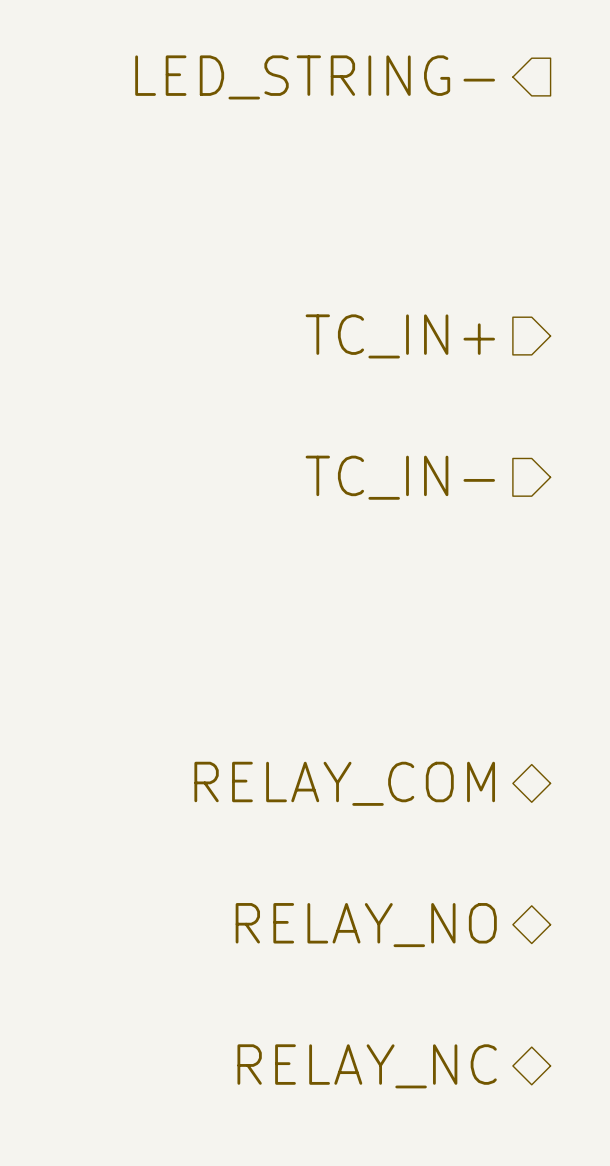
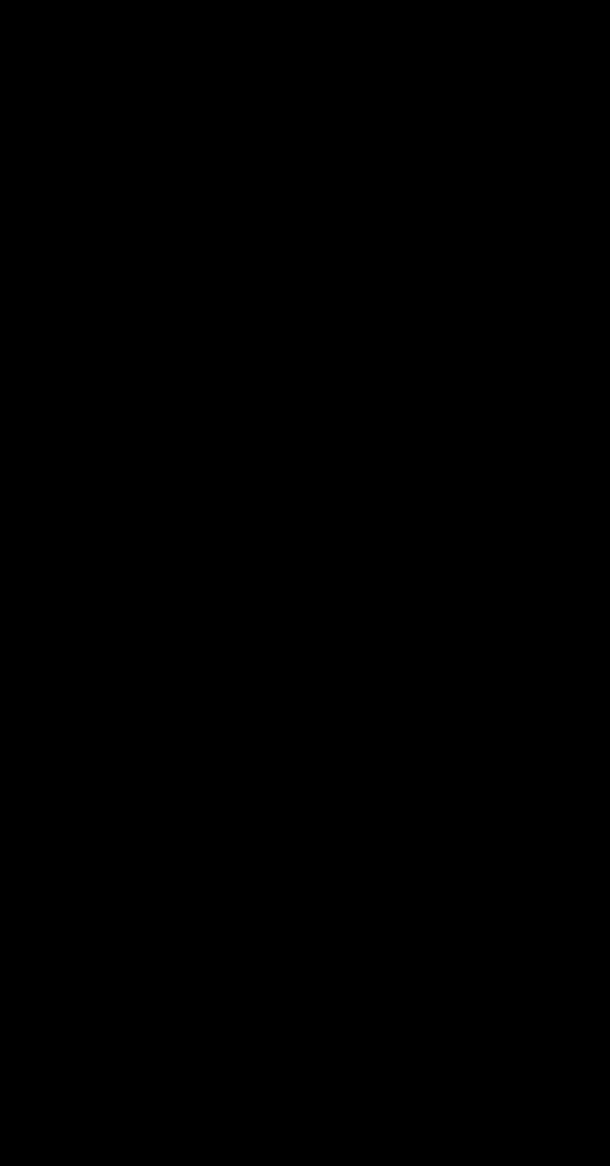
hierarchical label: LED_STRING- (315, 77) -> none
hierarchical label: TC_IN+ (400, 336) -> none
hierarchical label: TC_IN- (400, 477) -> none
hierarchical label: RELAY_COM (344, 783) -> none
hierarchical label: RELAY_NO (366, 925) -> none
hierarchical label: RELAY_NC (367, 1066) -> none

